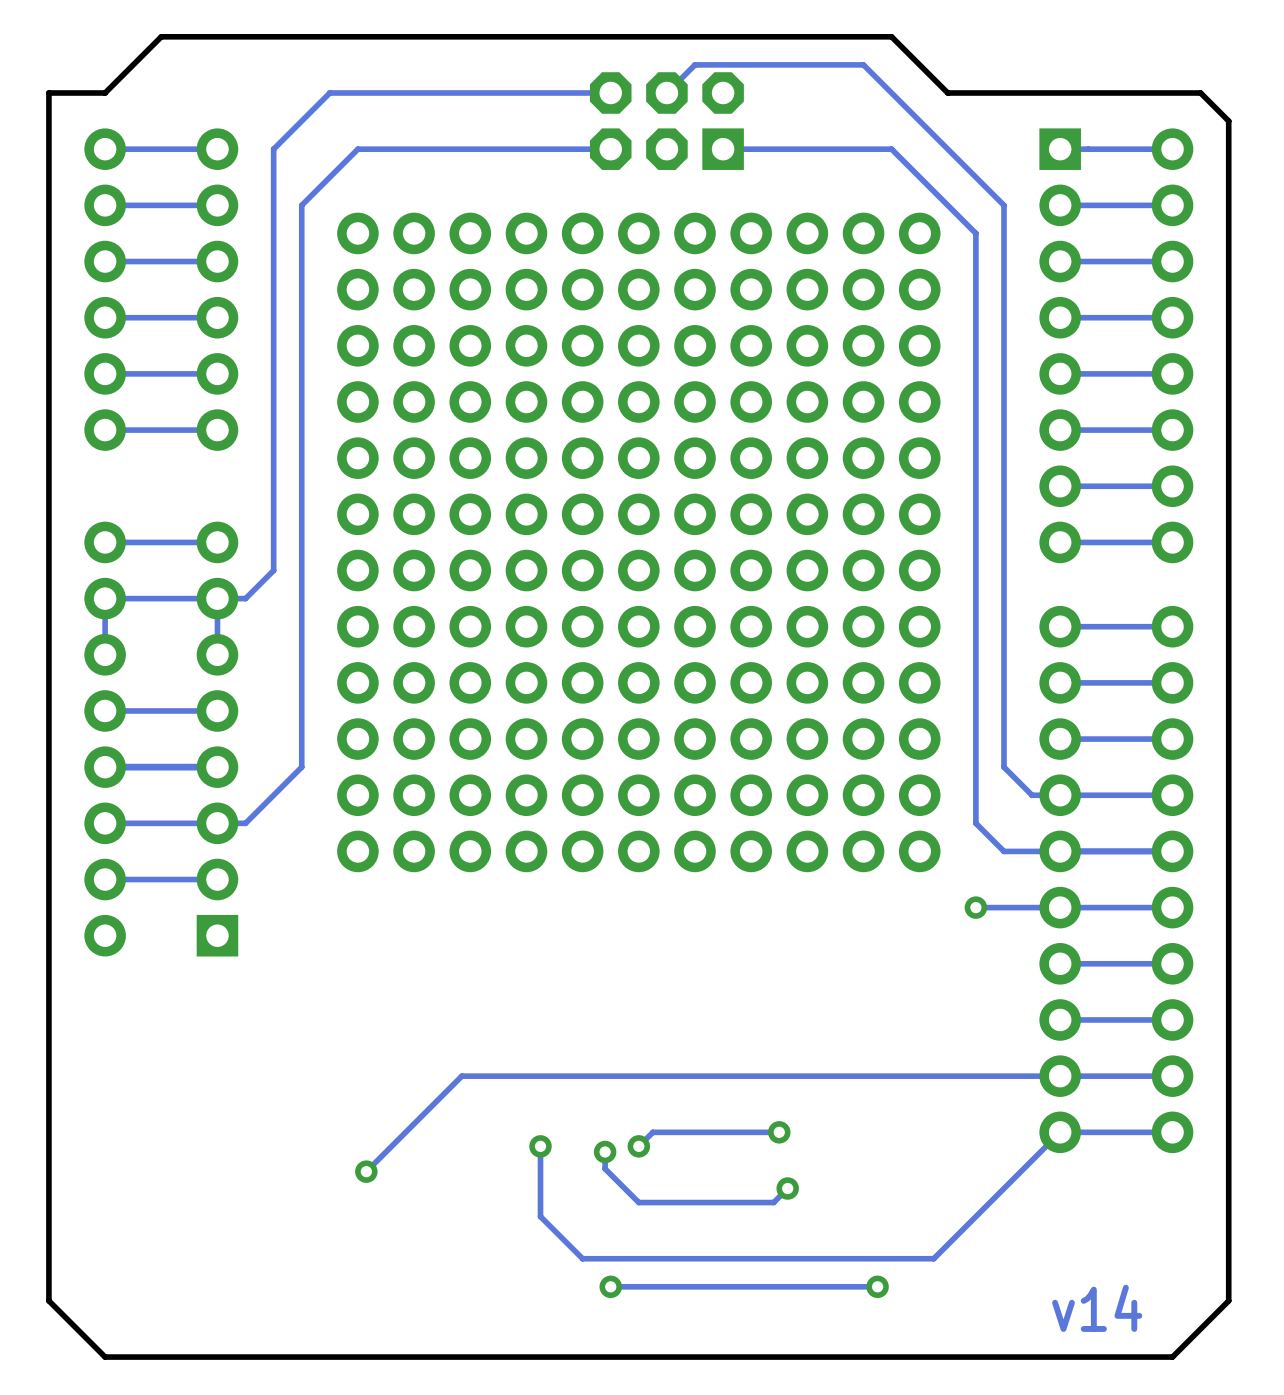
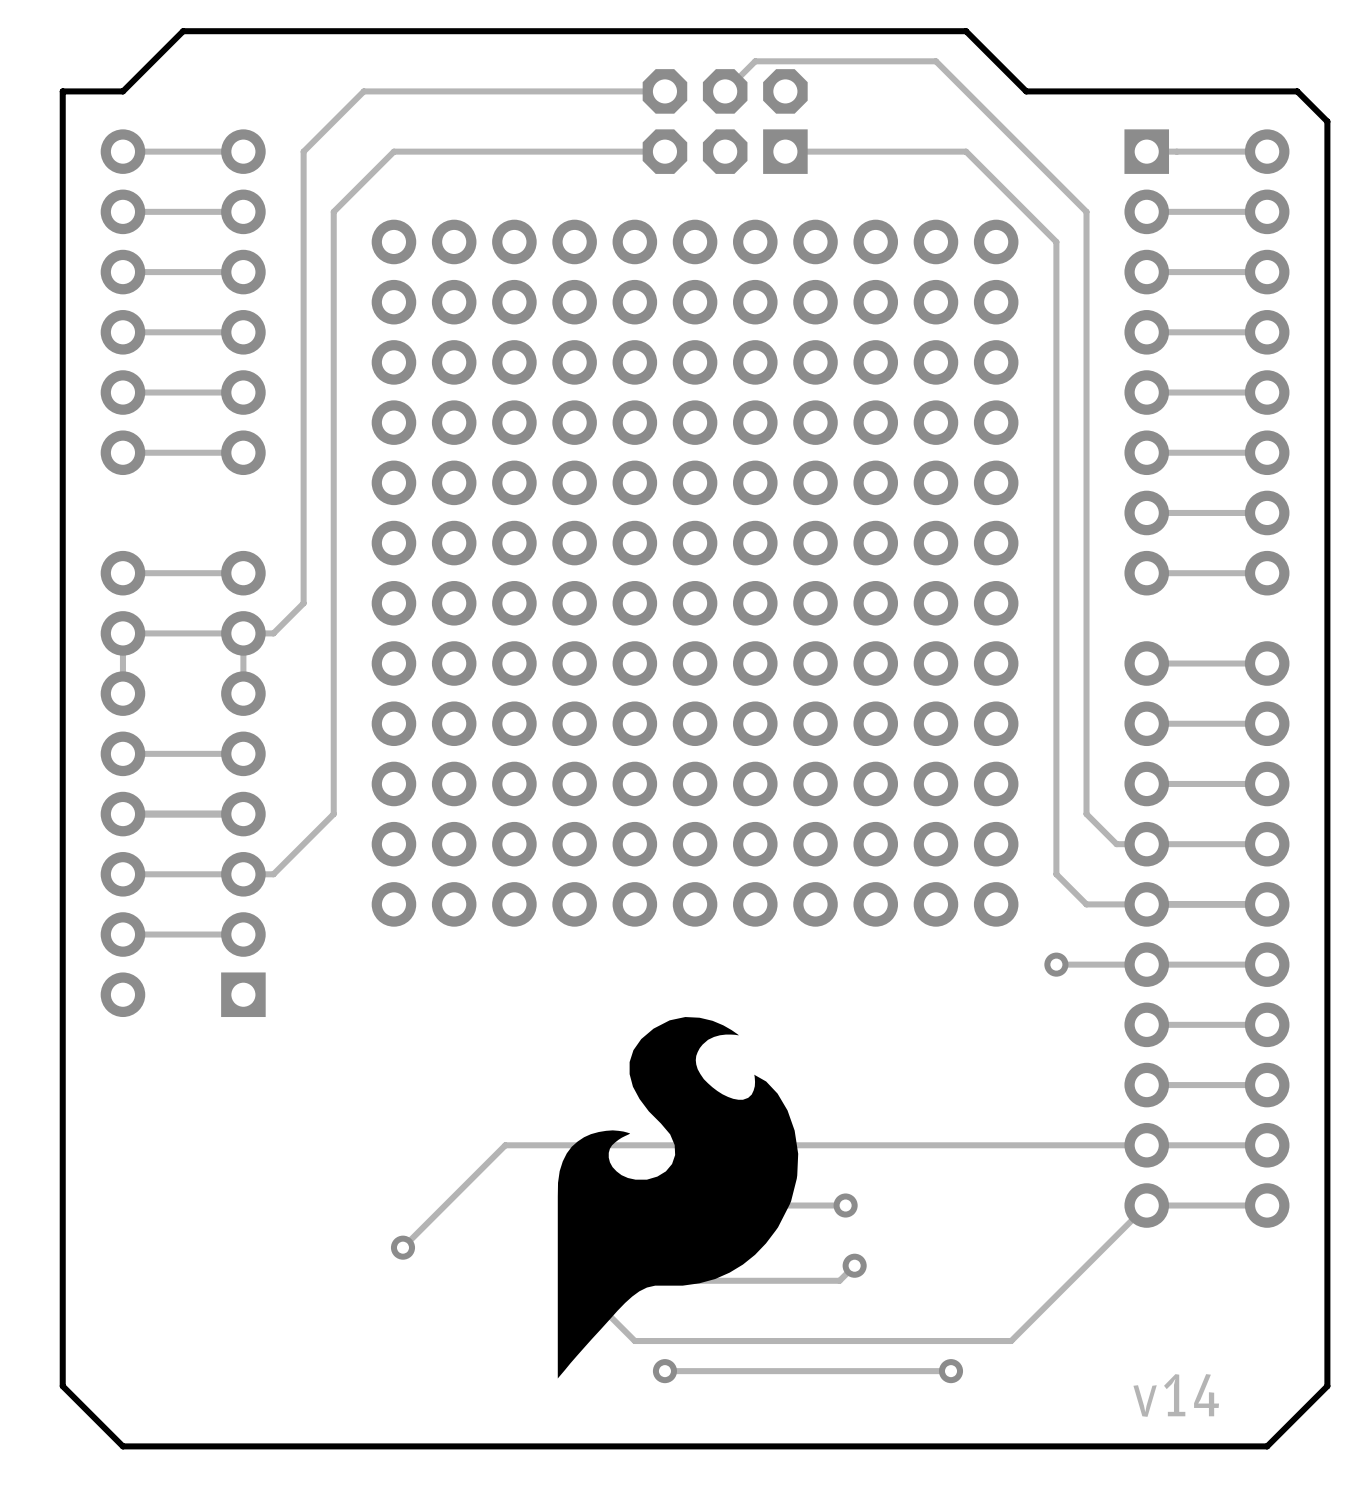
drawing: none -> [557, 1017, 799, 1379]

